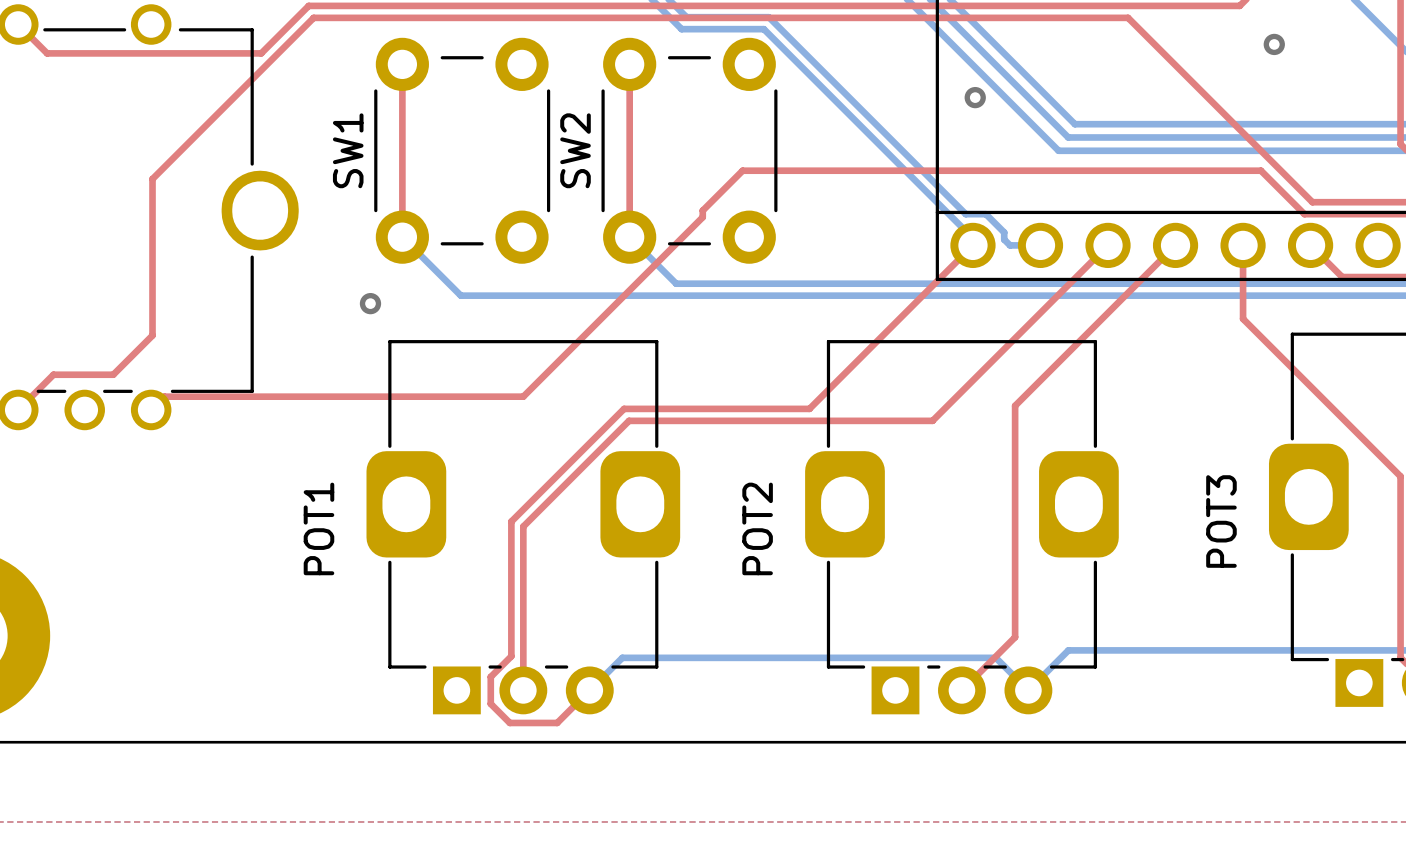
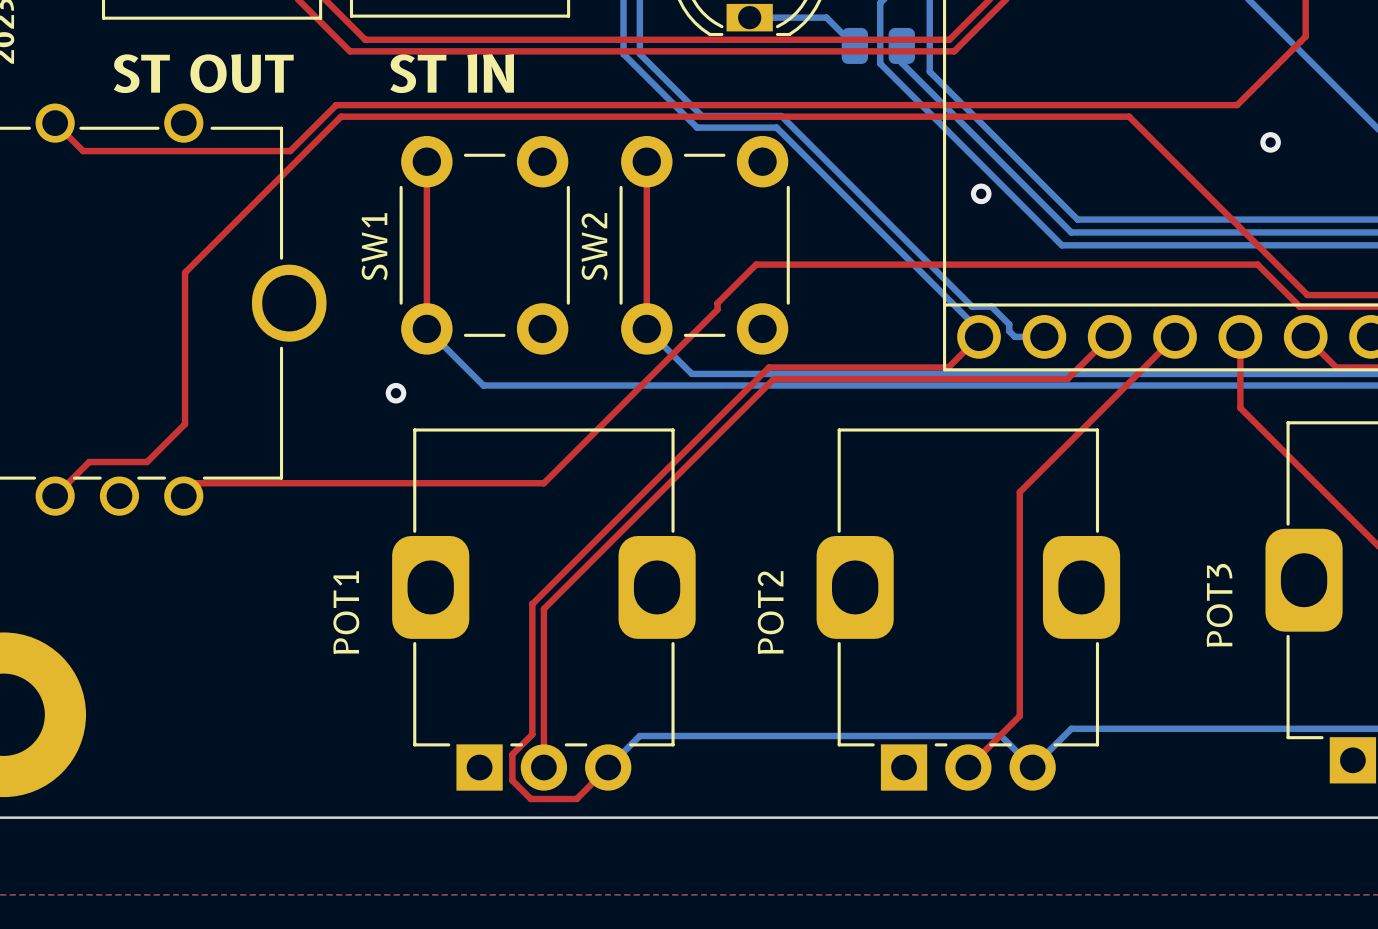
top track: (941, 277) (809, 408) (624, 408) -> (948, 367) (768, 367) (641, 495)
top track: (1064, 289) (932, 420) (629, 420) -> (1067, 379) (773, 379) (646, 506)

